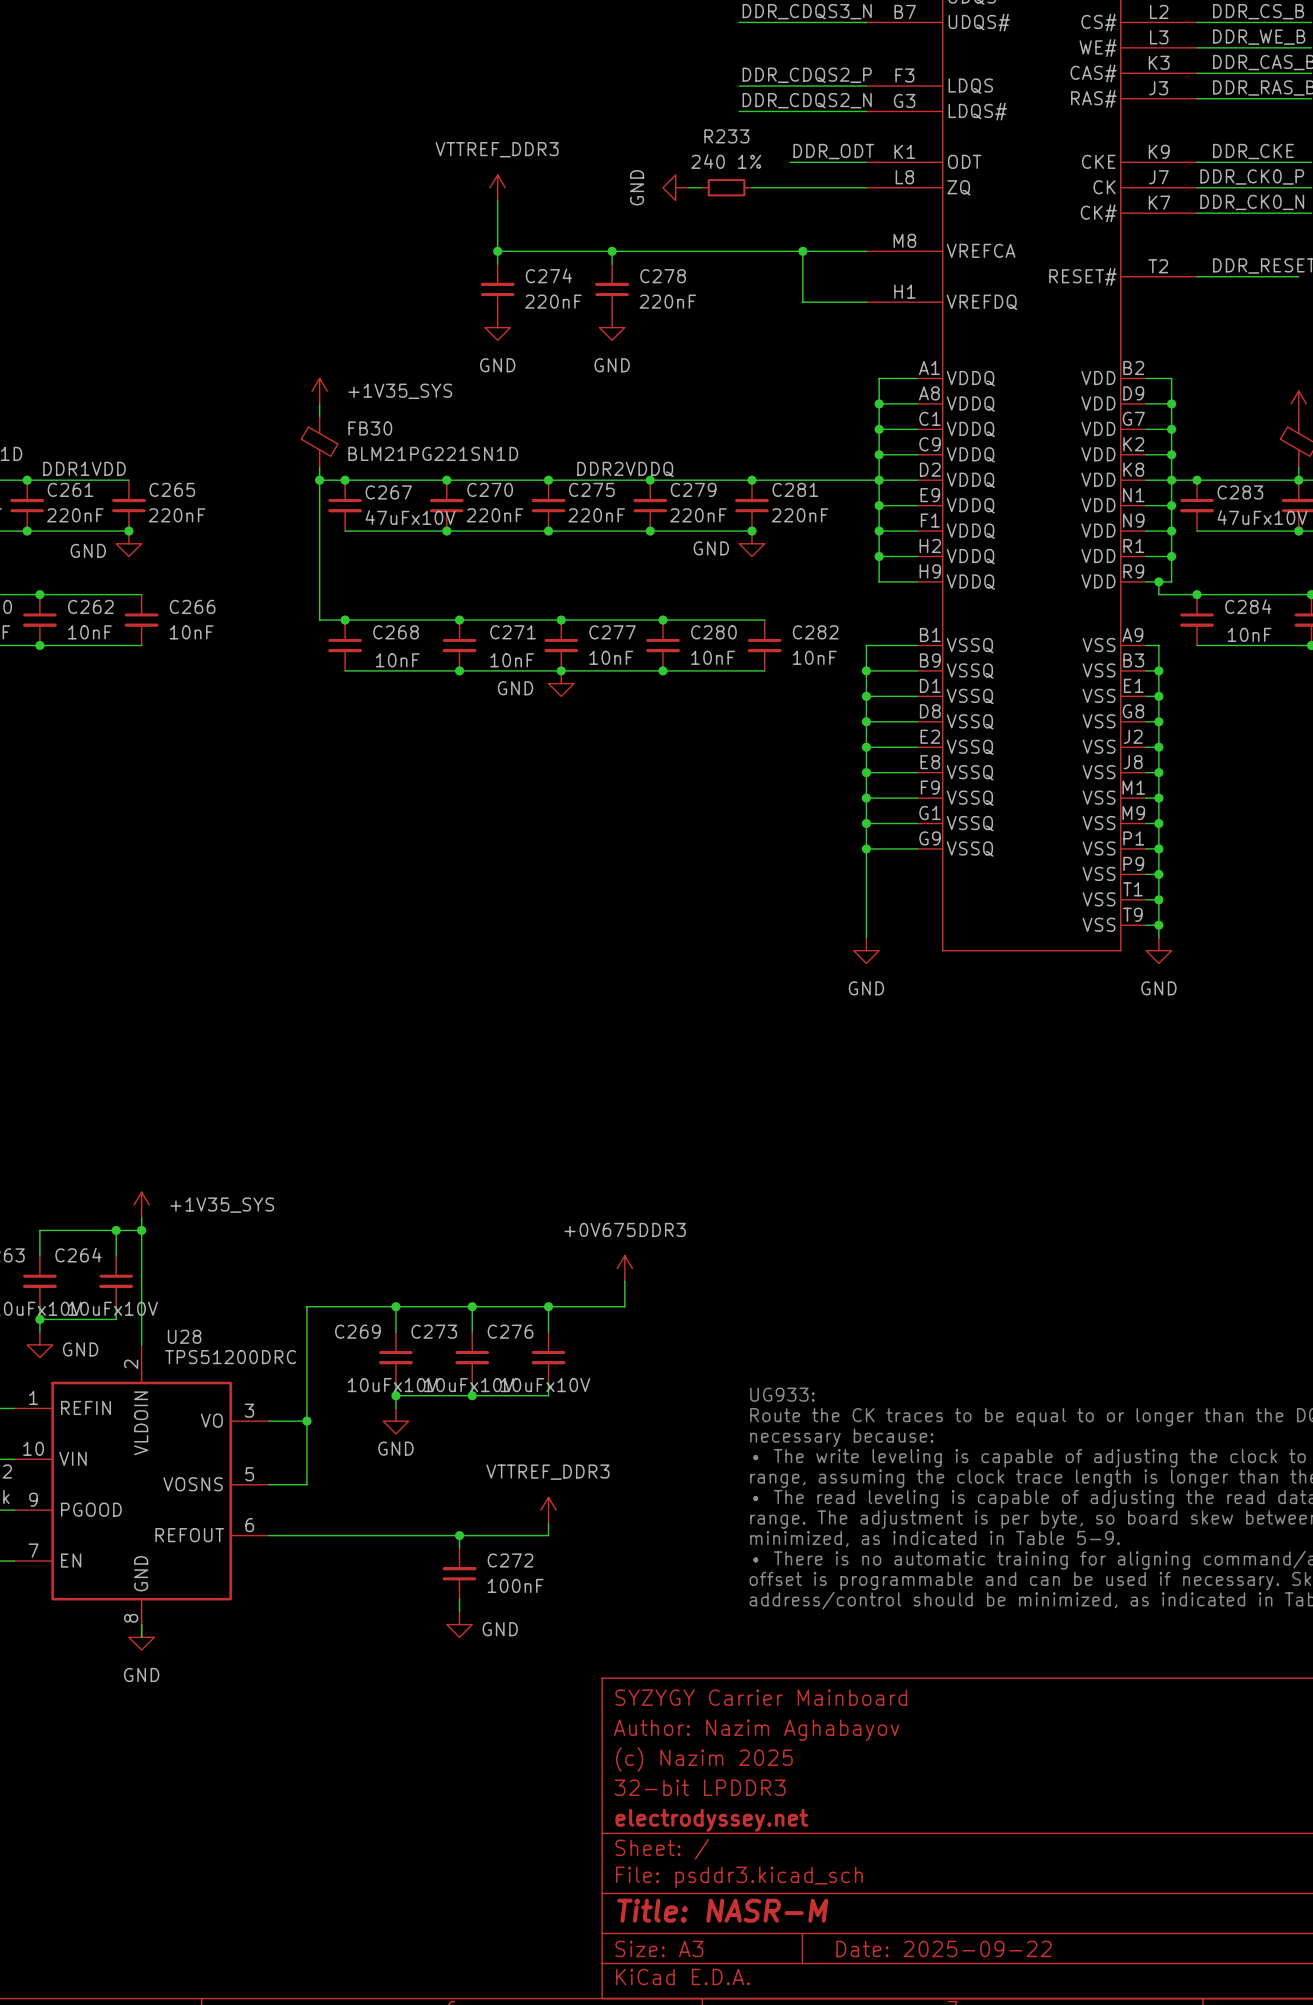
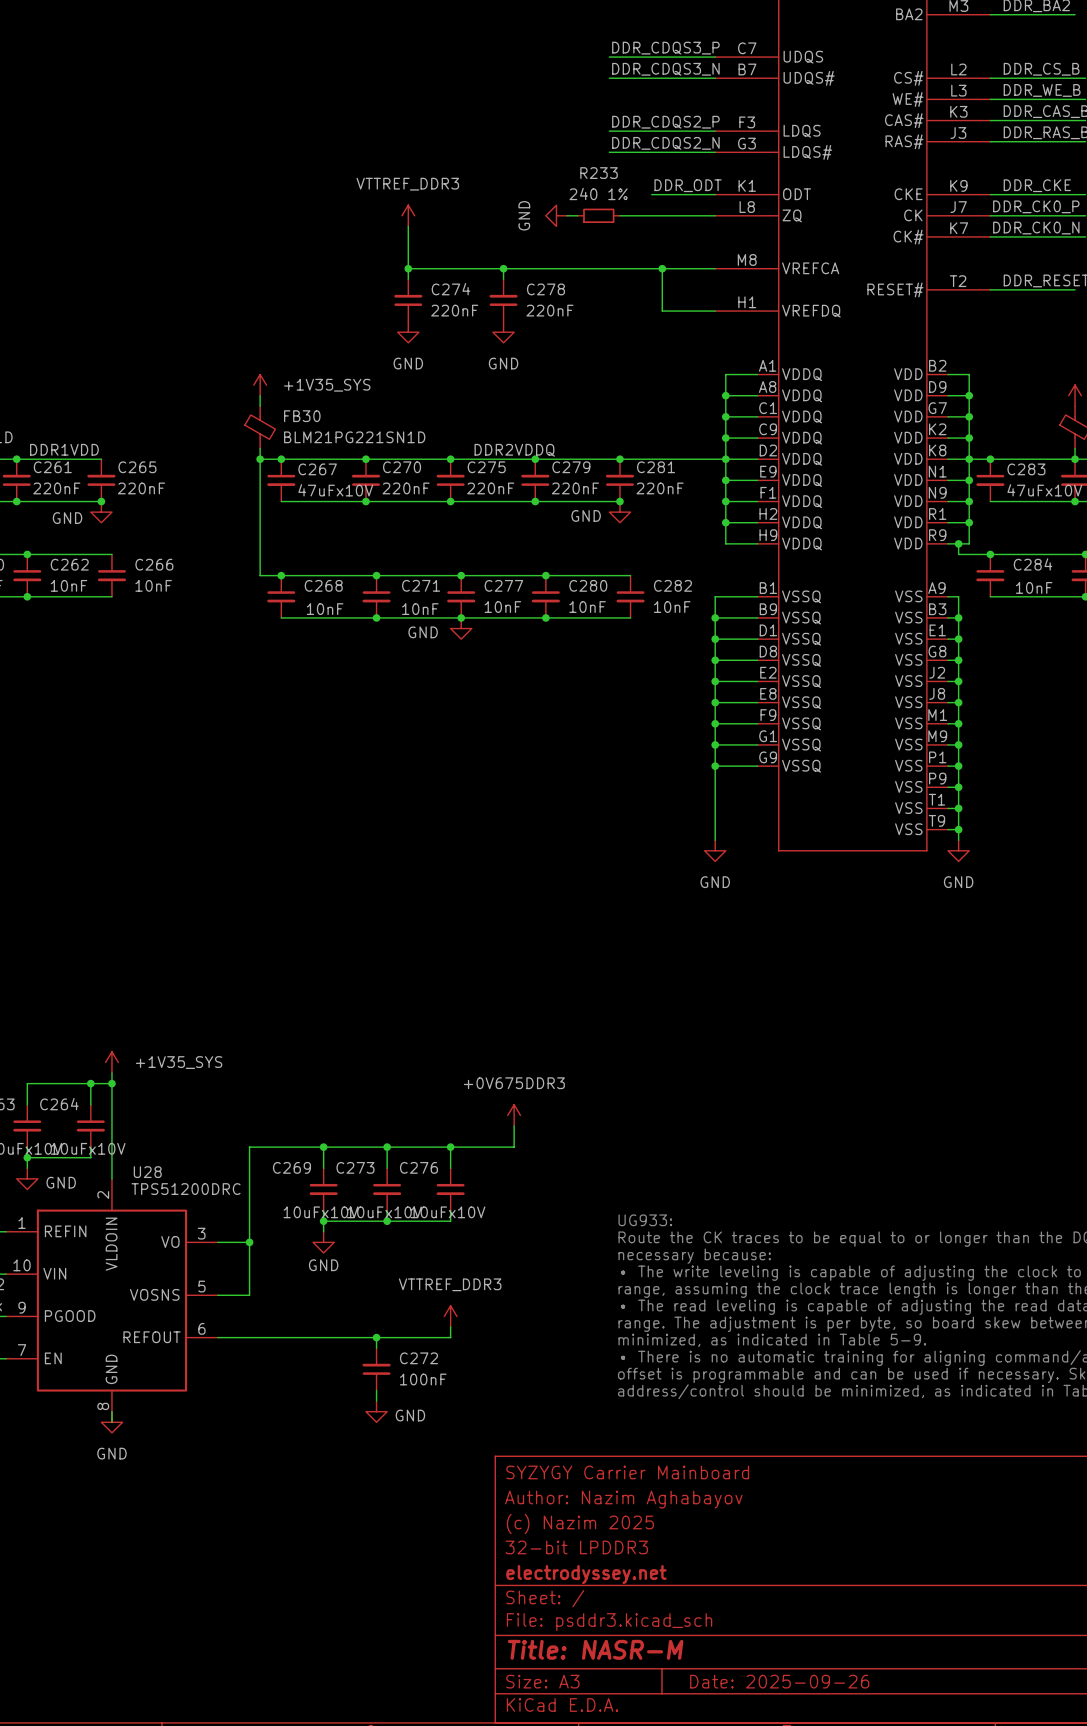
title block: Date: 2025-09-22 (943, 1948) -> Date: 2025-09-26 (779, 1681)

